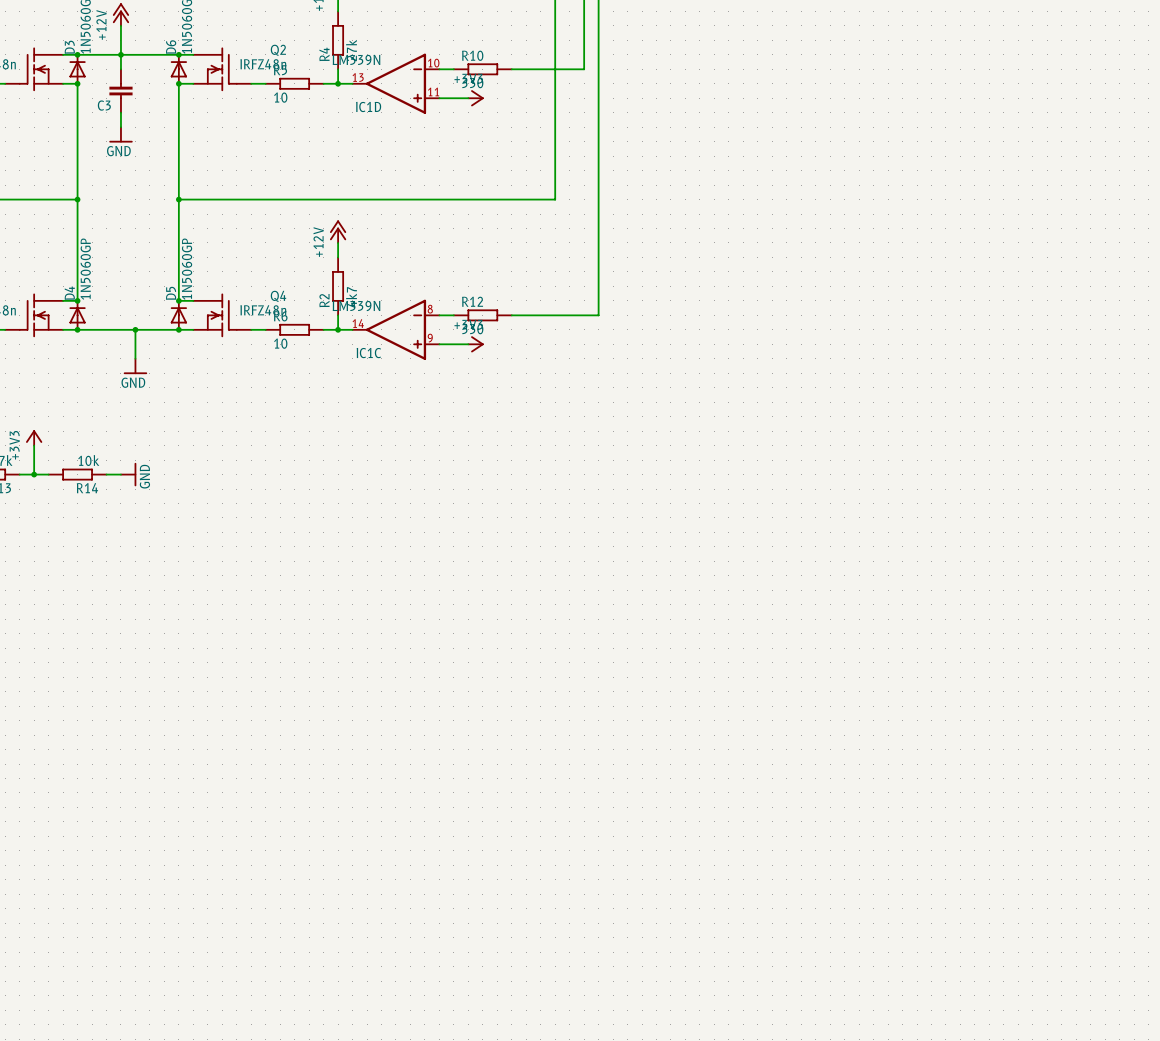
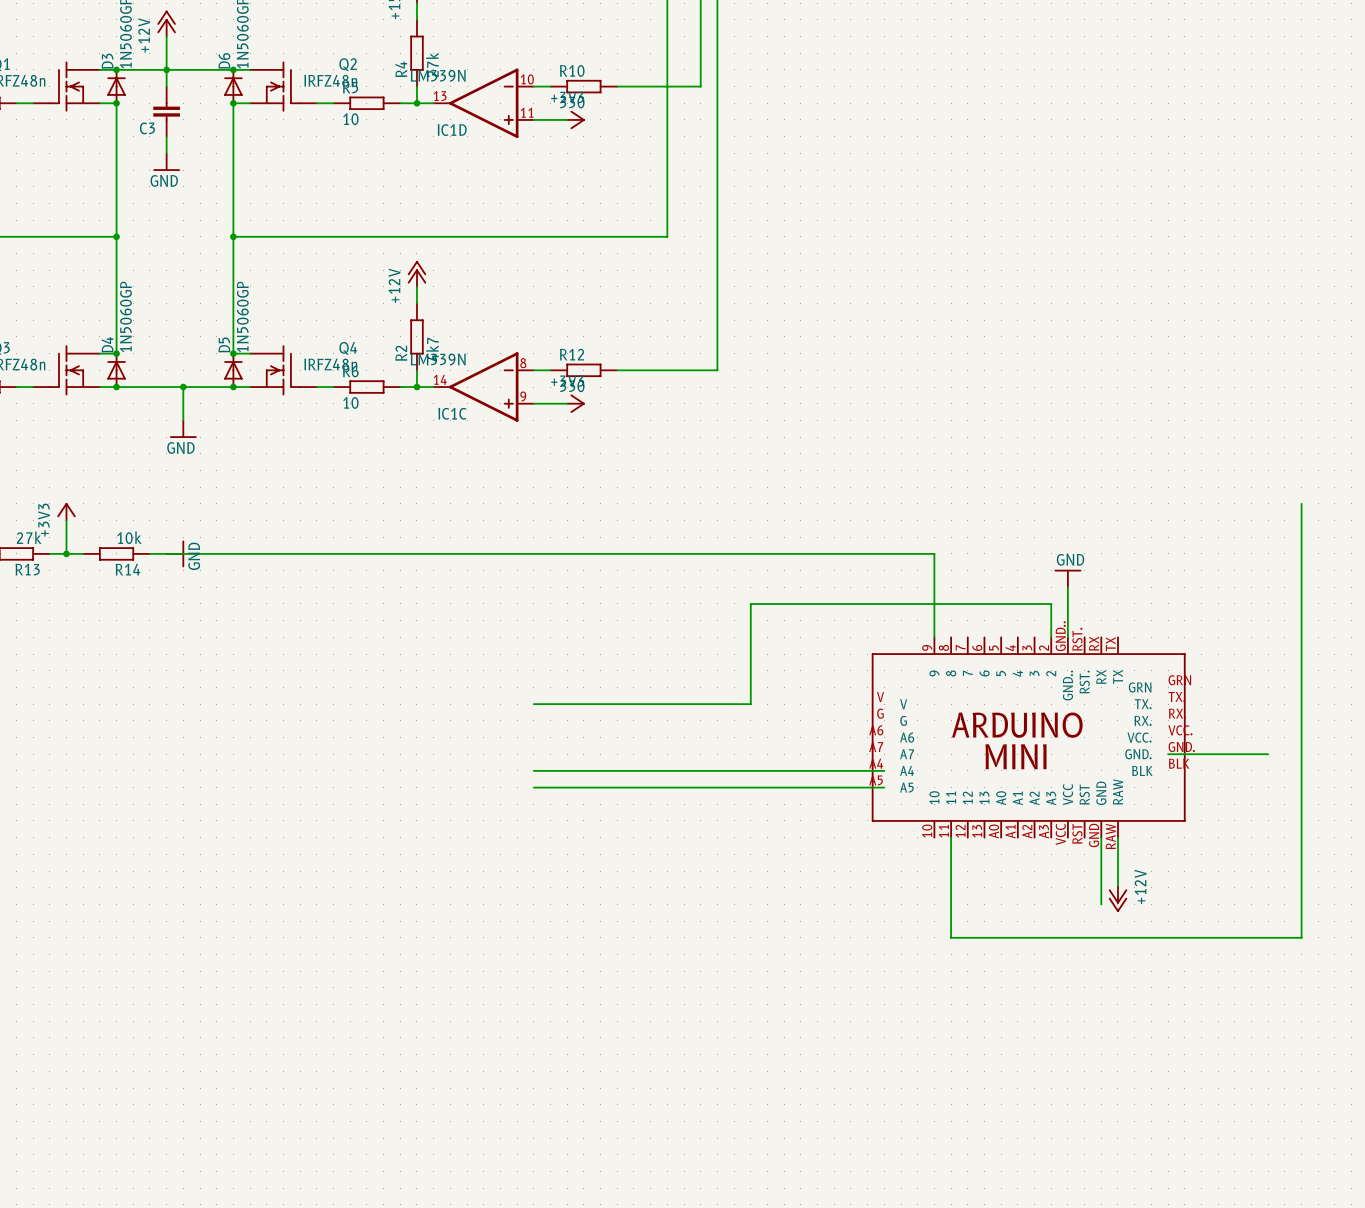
wire: none -> (1301, 503) (1301, 937) (951, 937) (951, 837)
wire: none -> (166, 553) (934, 553) (934, 637)
power symbol: none -> GND (1067, 578)
wire: none -> (1067, 587) (1067, 637)
wire: none -> (1051, 637) (1051, 603) (750, 603) (750, 704) (533, 704)
part: none -> (1028, 737)
wire: none -> (1168, 754) (1268, 754)
wire: none -> (533, 770) (884, 770)
wire: none -> (533, 787) (884, 787)
wire: none -> (1101, 837) (1101, 904)
wire: none -> (1117, 837) (1117, 886)
power symbol: none -> +12V (1117, 899)

